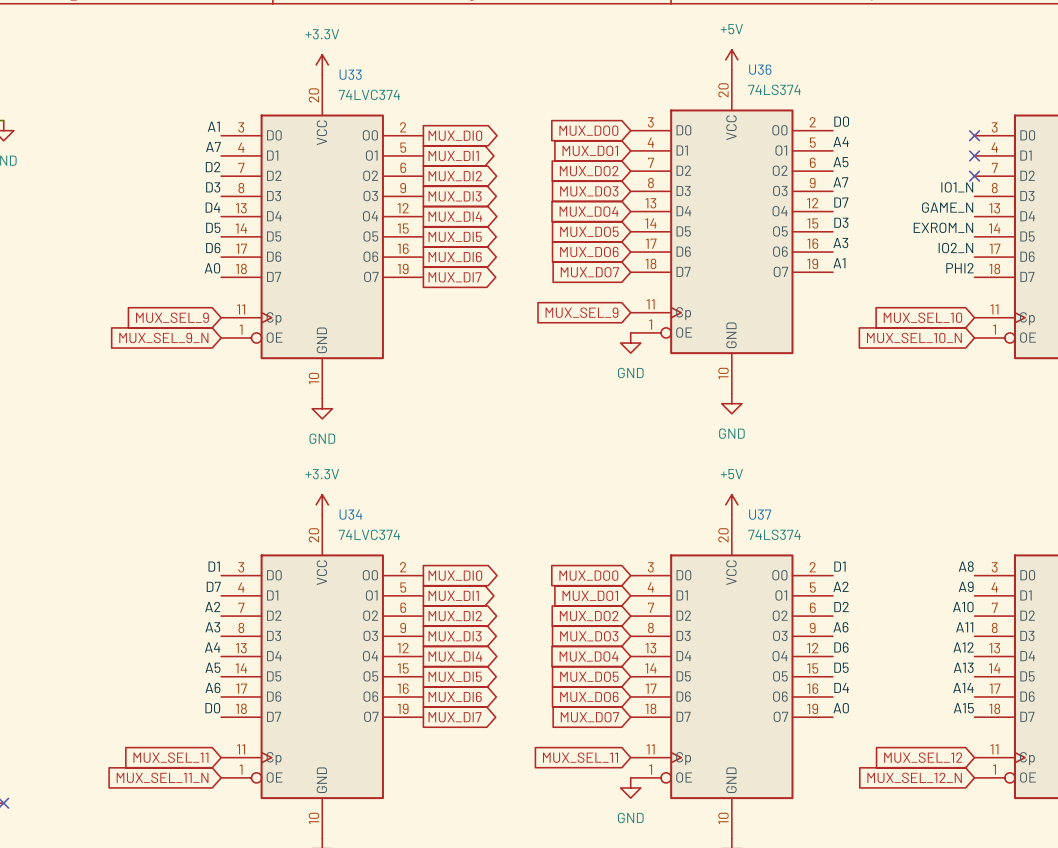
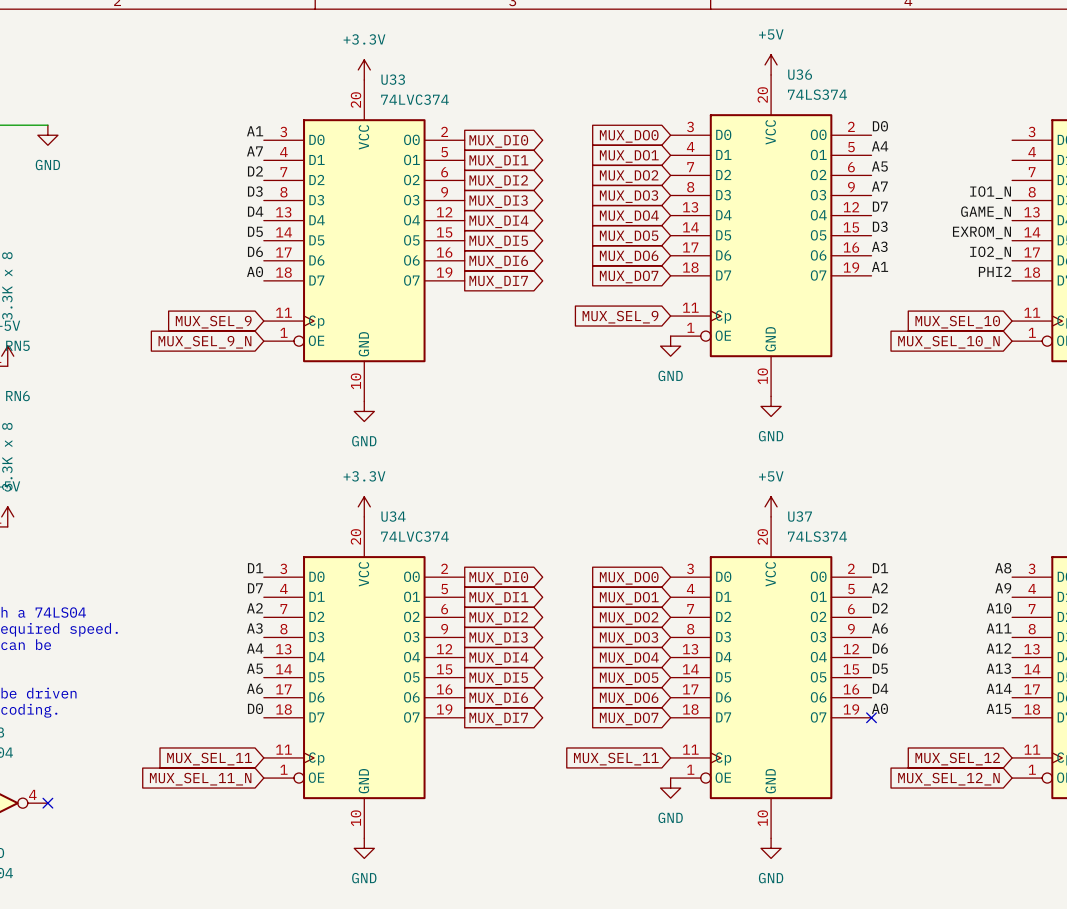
no-connect mark: (974, 135) -> none
no-connect mark: (974, 155) -> none
no-connect mark: (974, 176) -> none
no-connect mark: none -> (871, 717)

